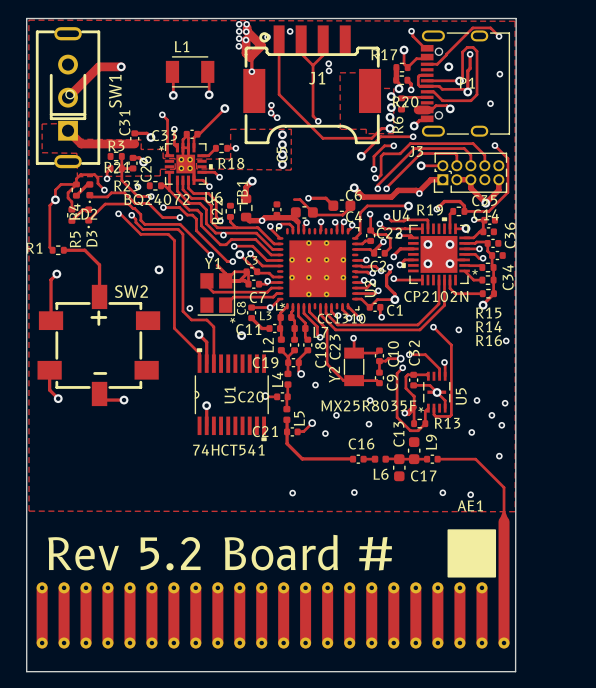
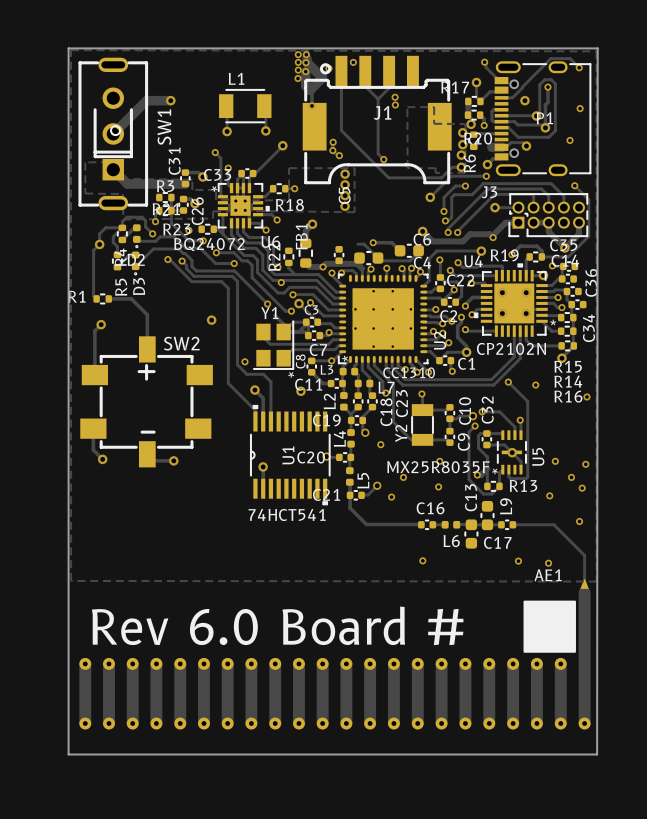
via: (292, 493) -> none
text: Rev 5.2 Board # (220, 552) -> Rev 6.0 Board # (277, 625)

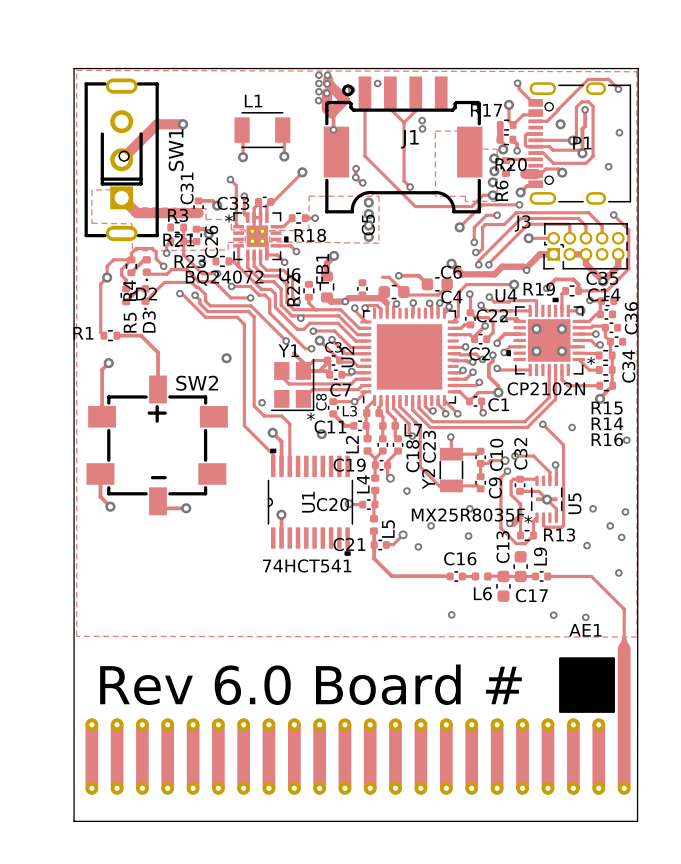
U2 footprint: [338, 273, 429, 365] -> [360, 307, 459, 407]
U2 name position: U2 (440, 340) -> U2 (347, 357)
U2 value: CC1310 (409, 372) -> none

